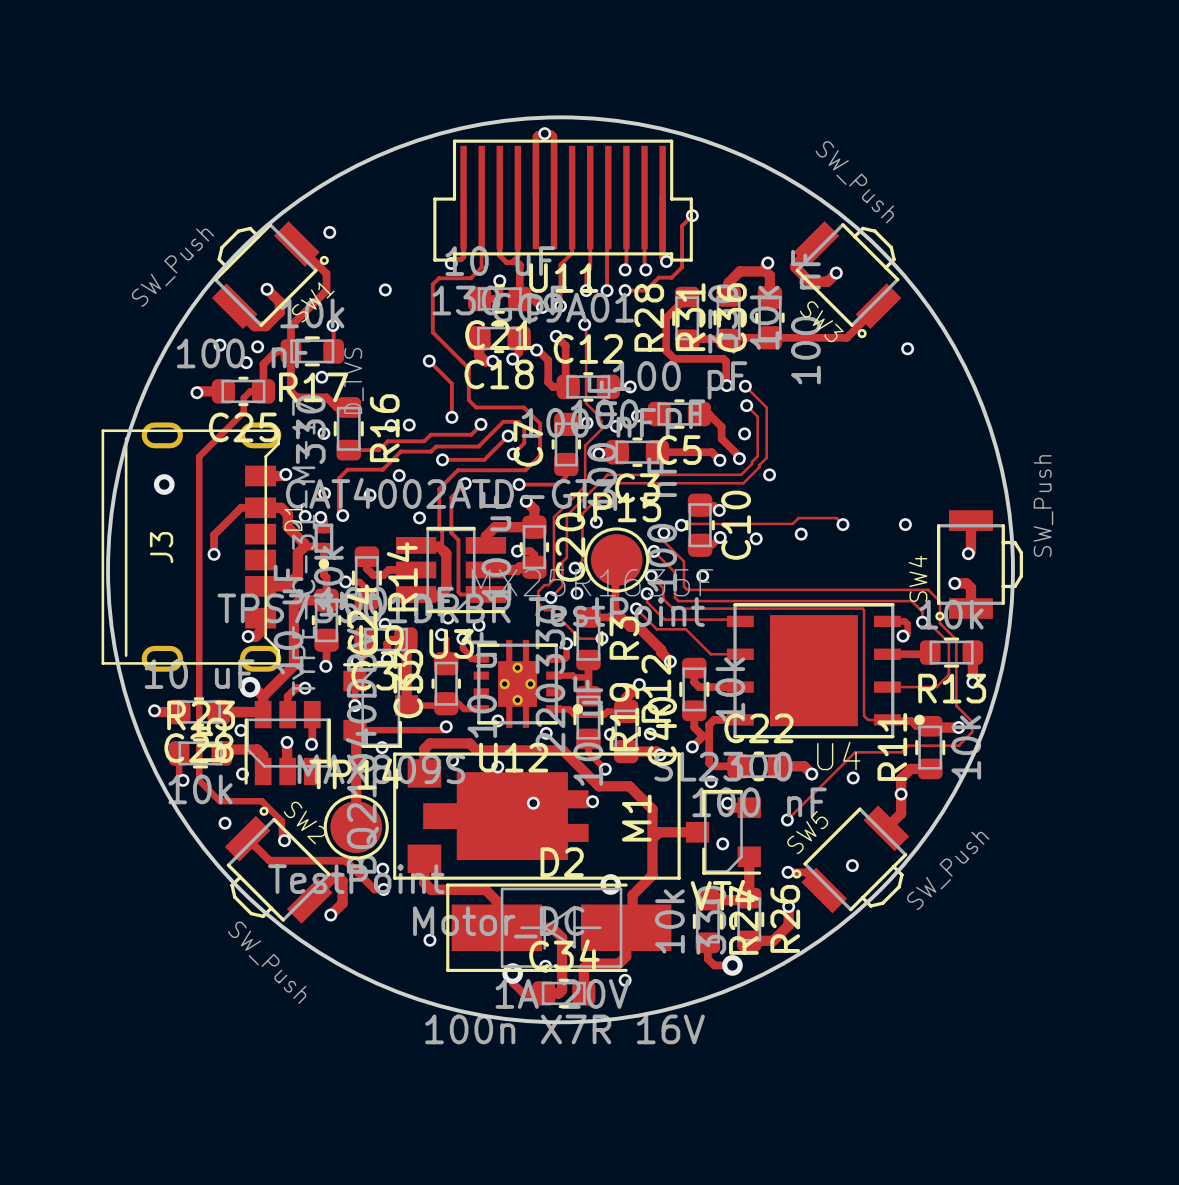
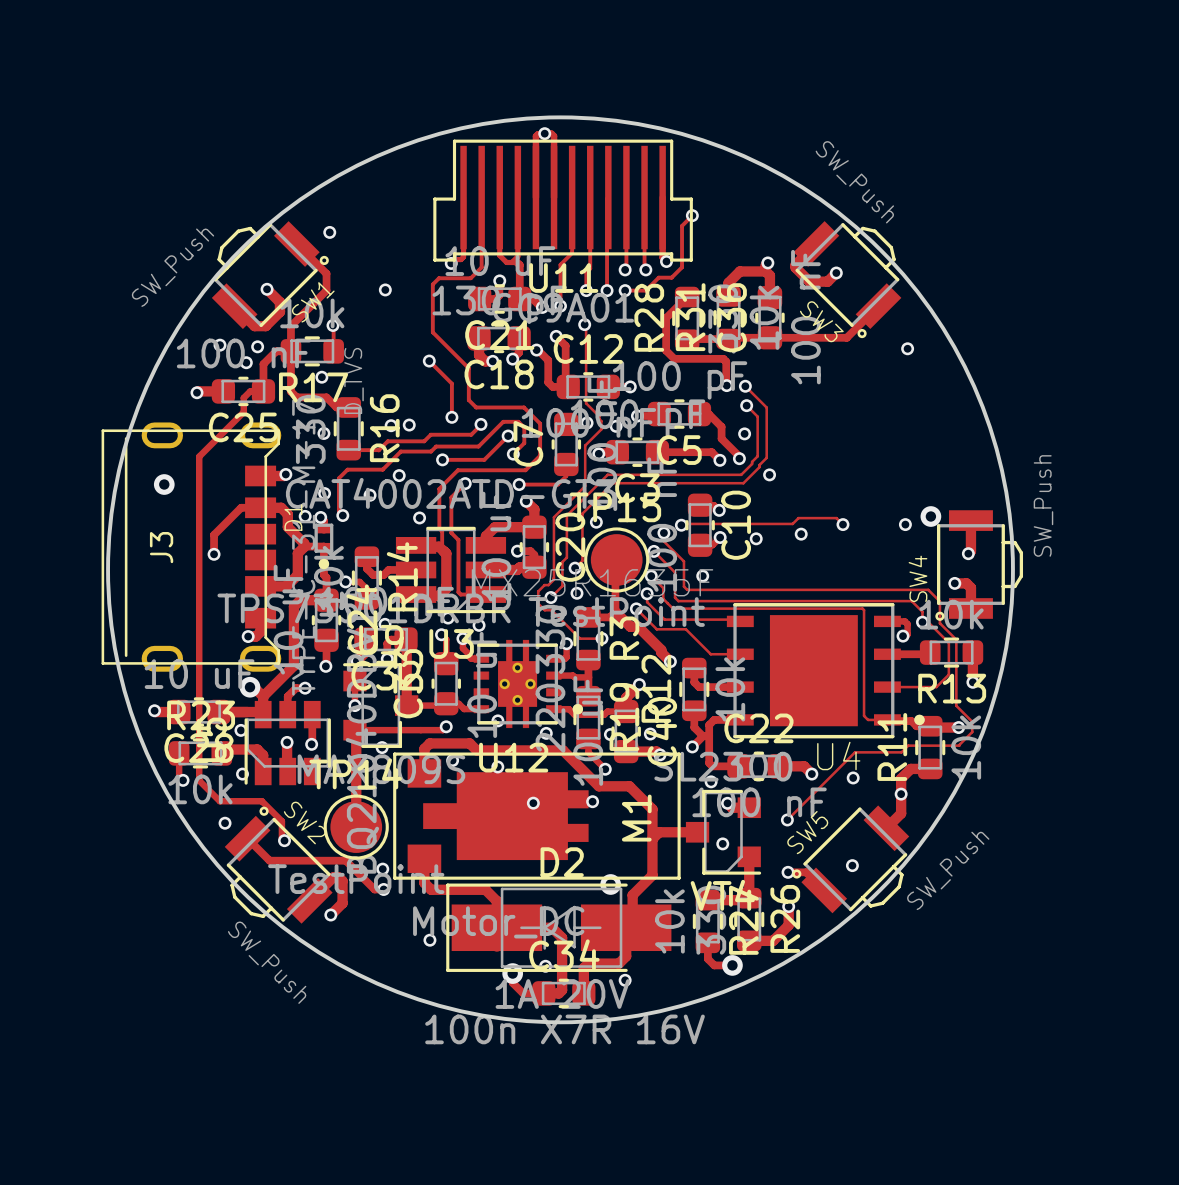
via: none -> (930, 516)

